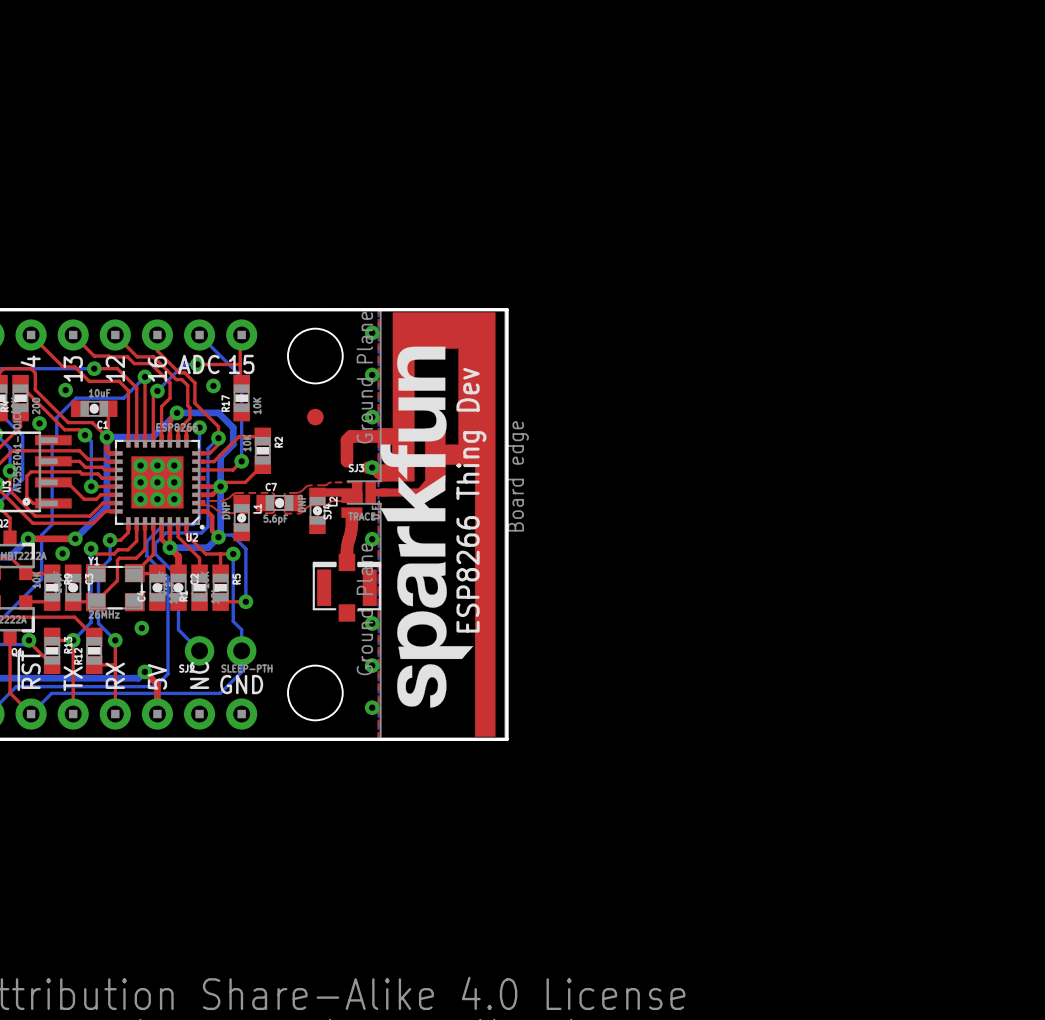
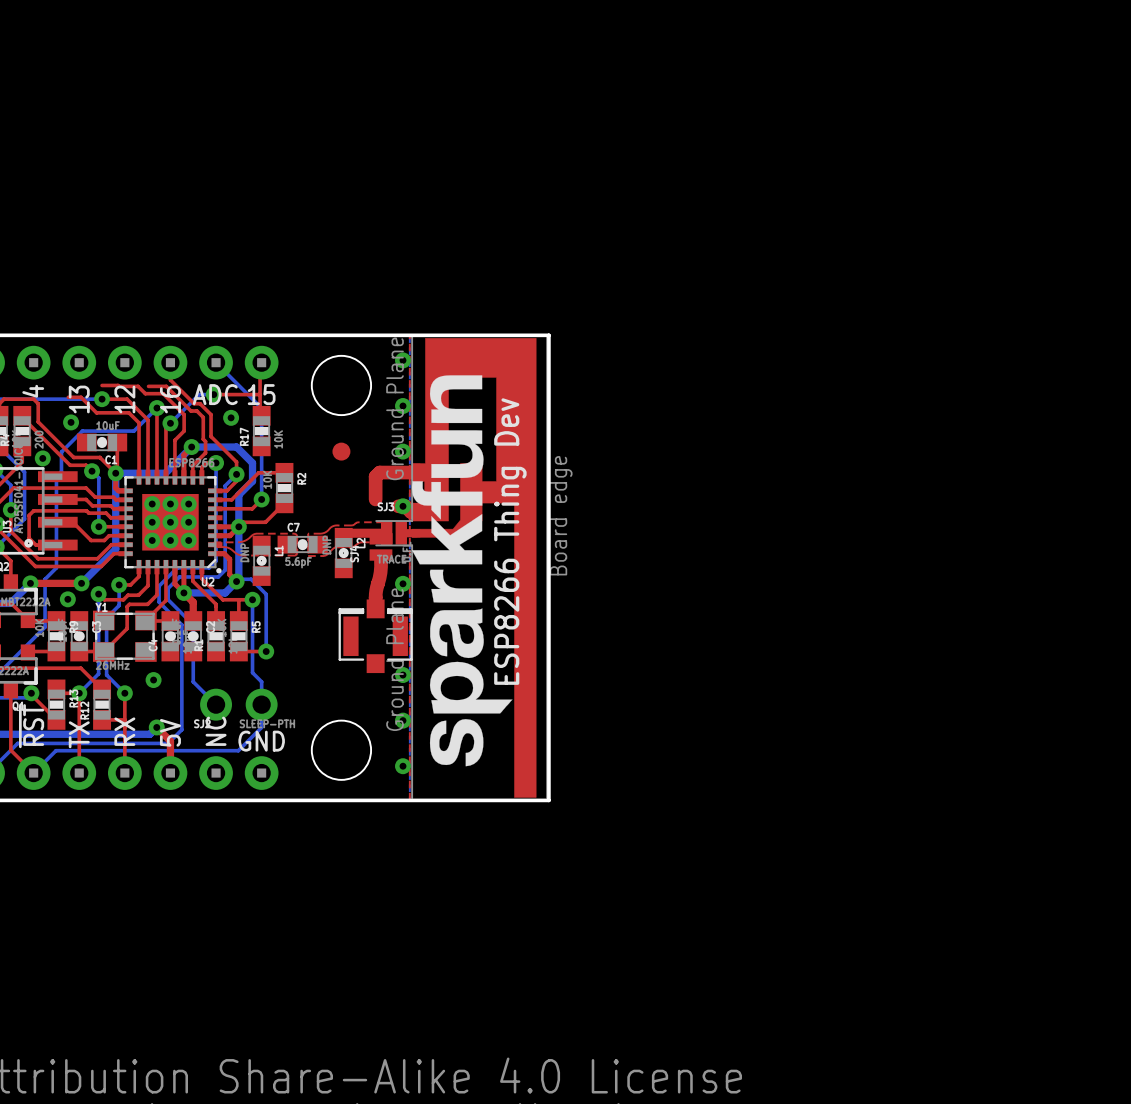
top track: (31, 334) (63, 367) -> none
top track: (73, 334) (94, 356) -> none
top track: (115, 334) (137, 356) -> none

